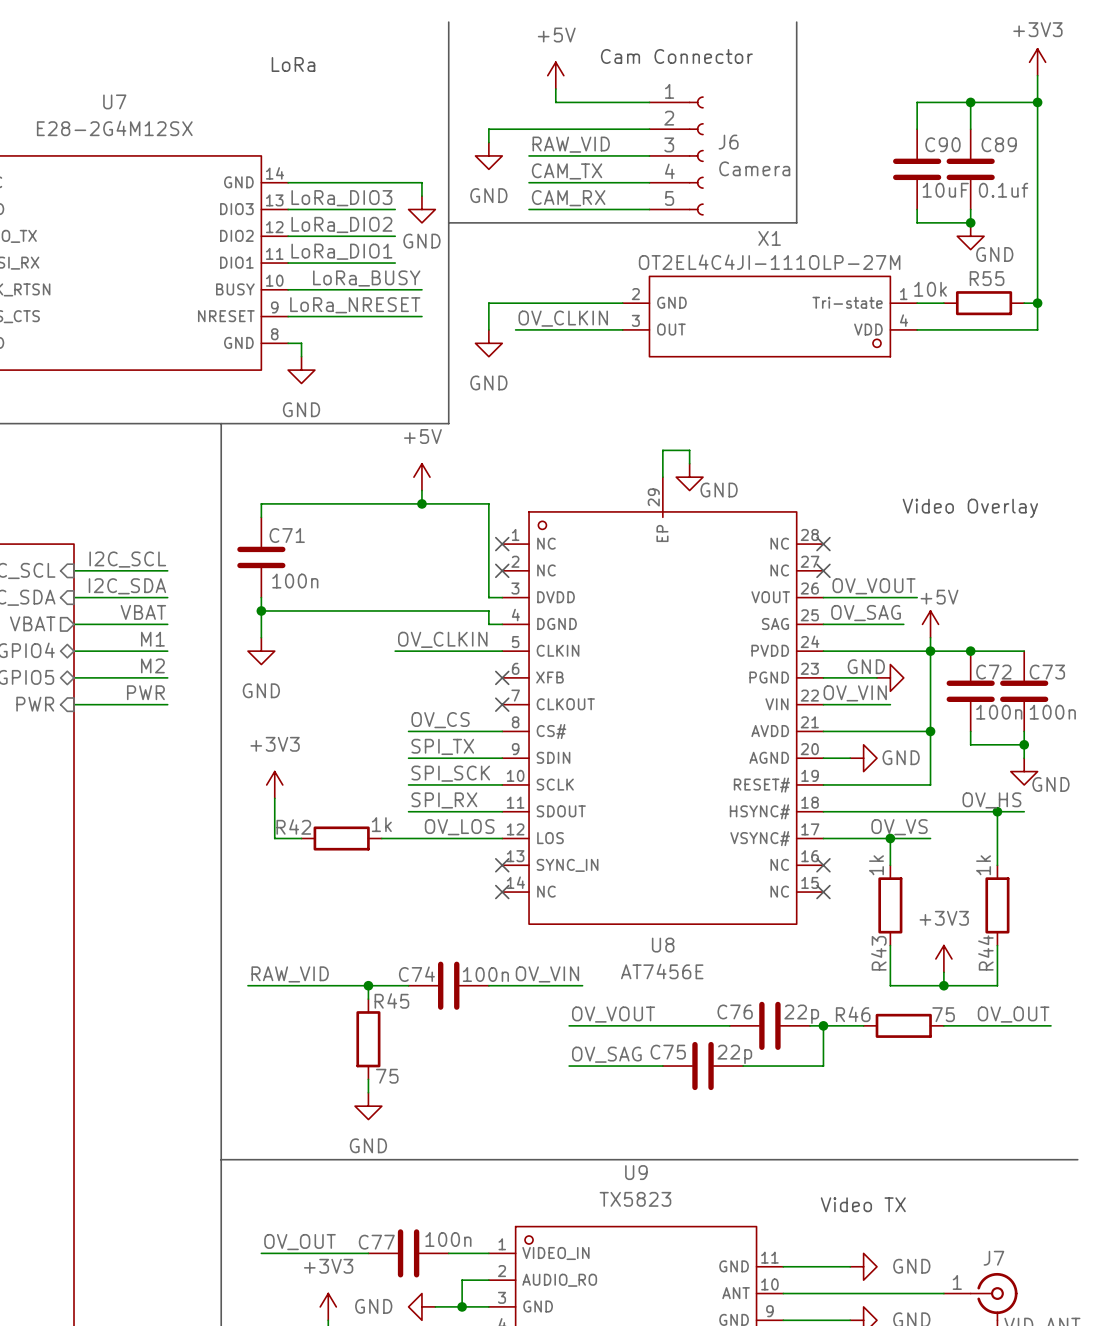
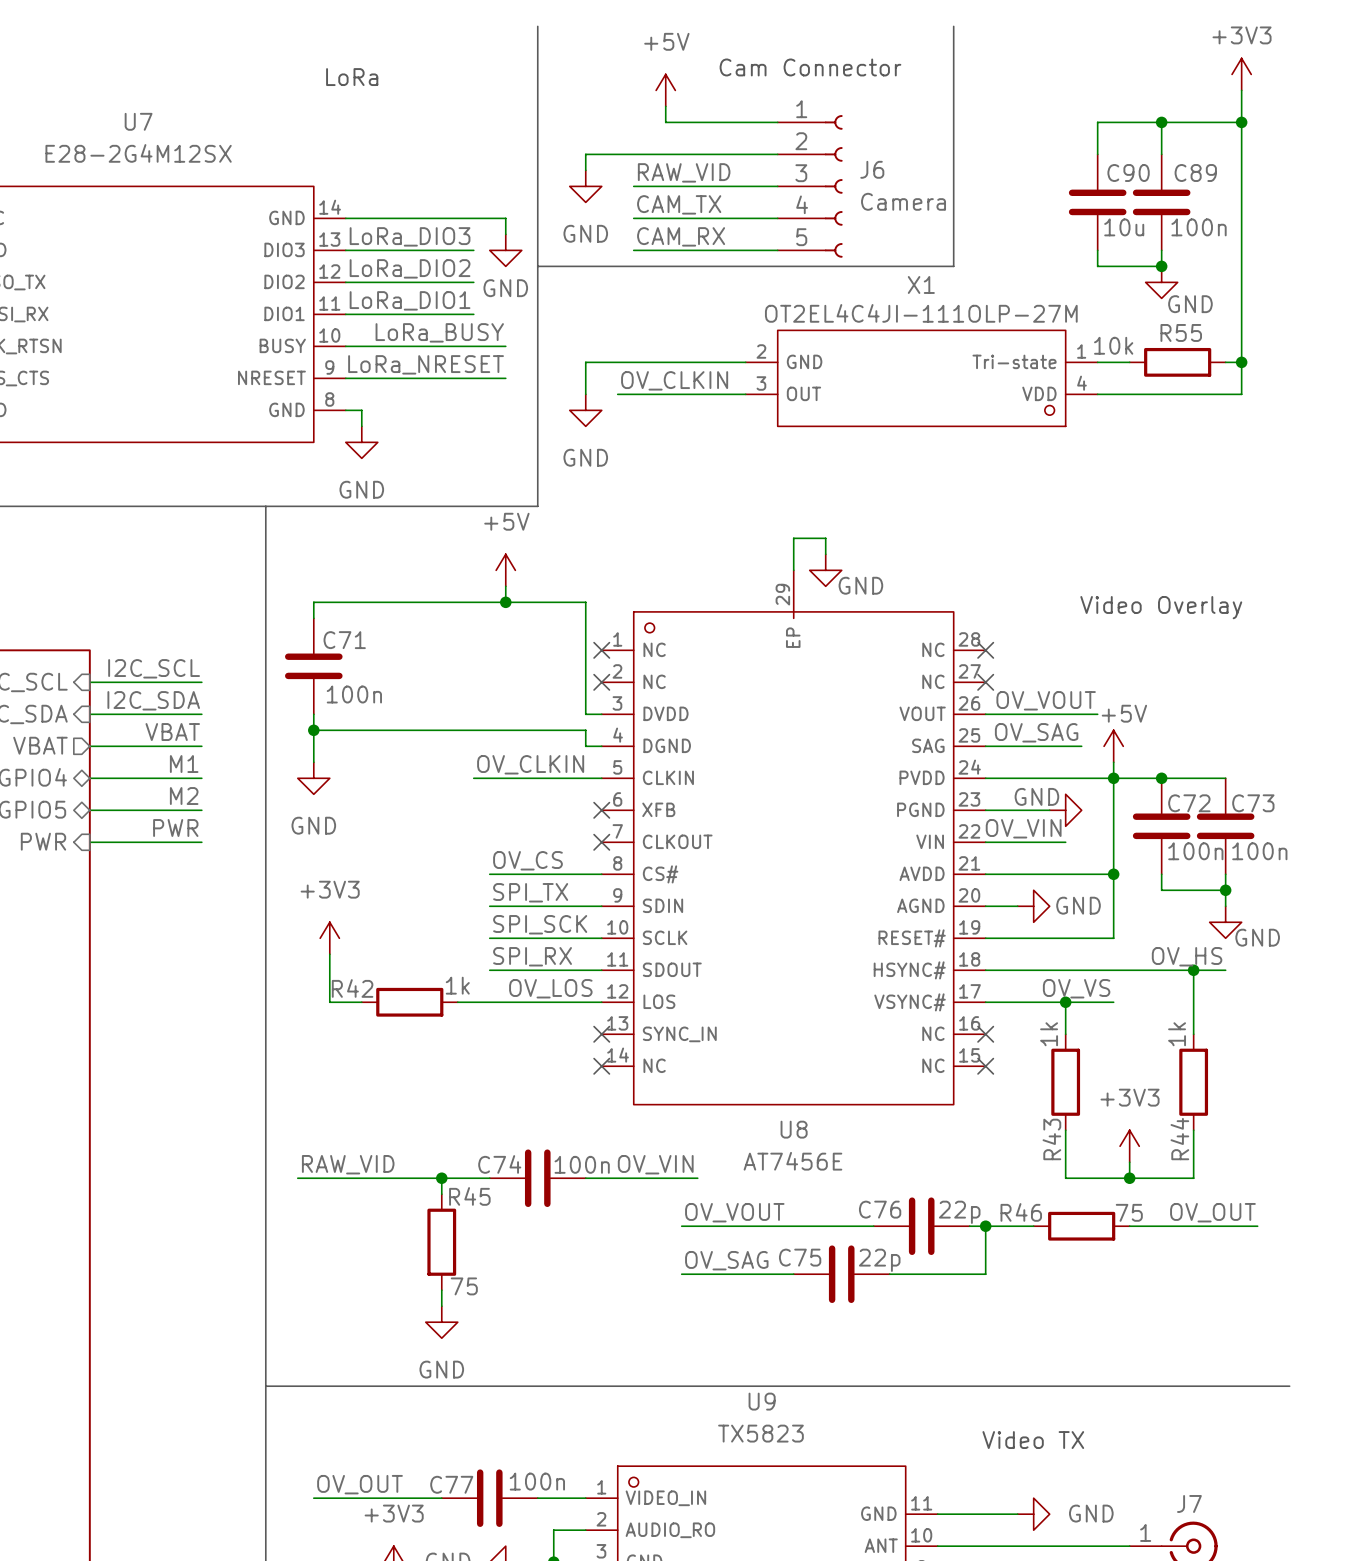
C90 value: 10uF (945, 190) -> 10u (1124, 227)
C89 value: 0.1uf (1003, 190) -> 100n (1199, 227)

